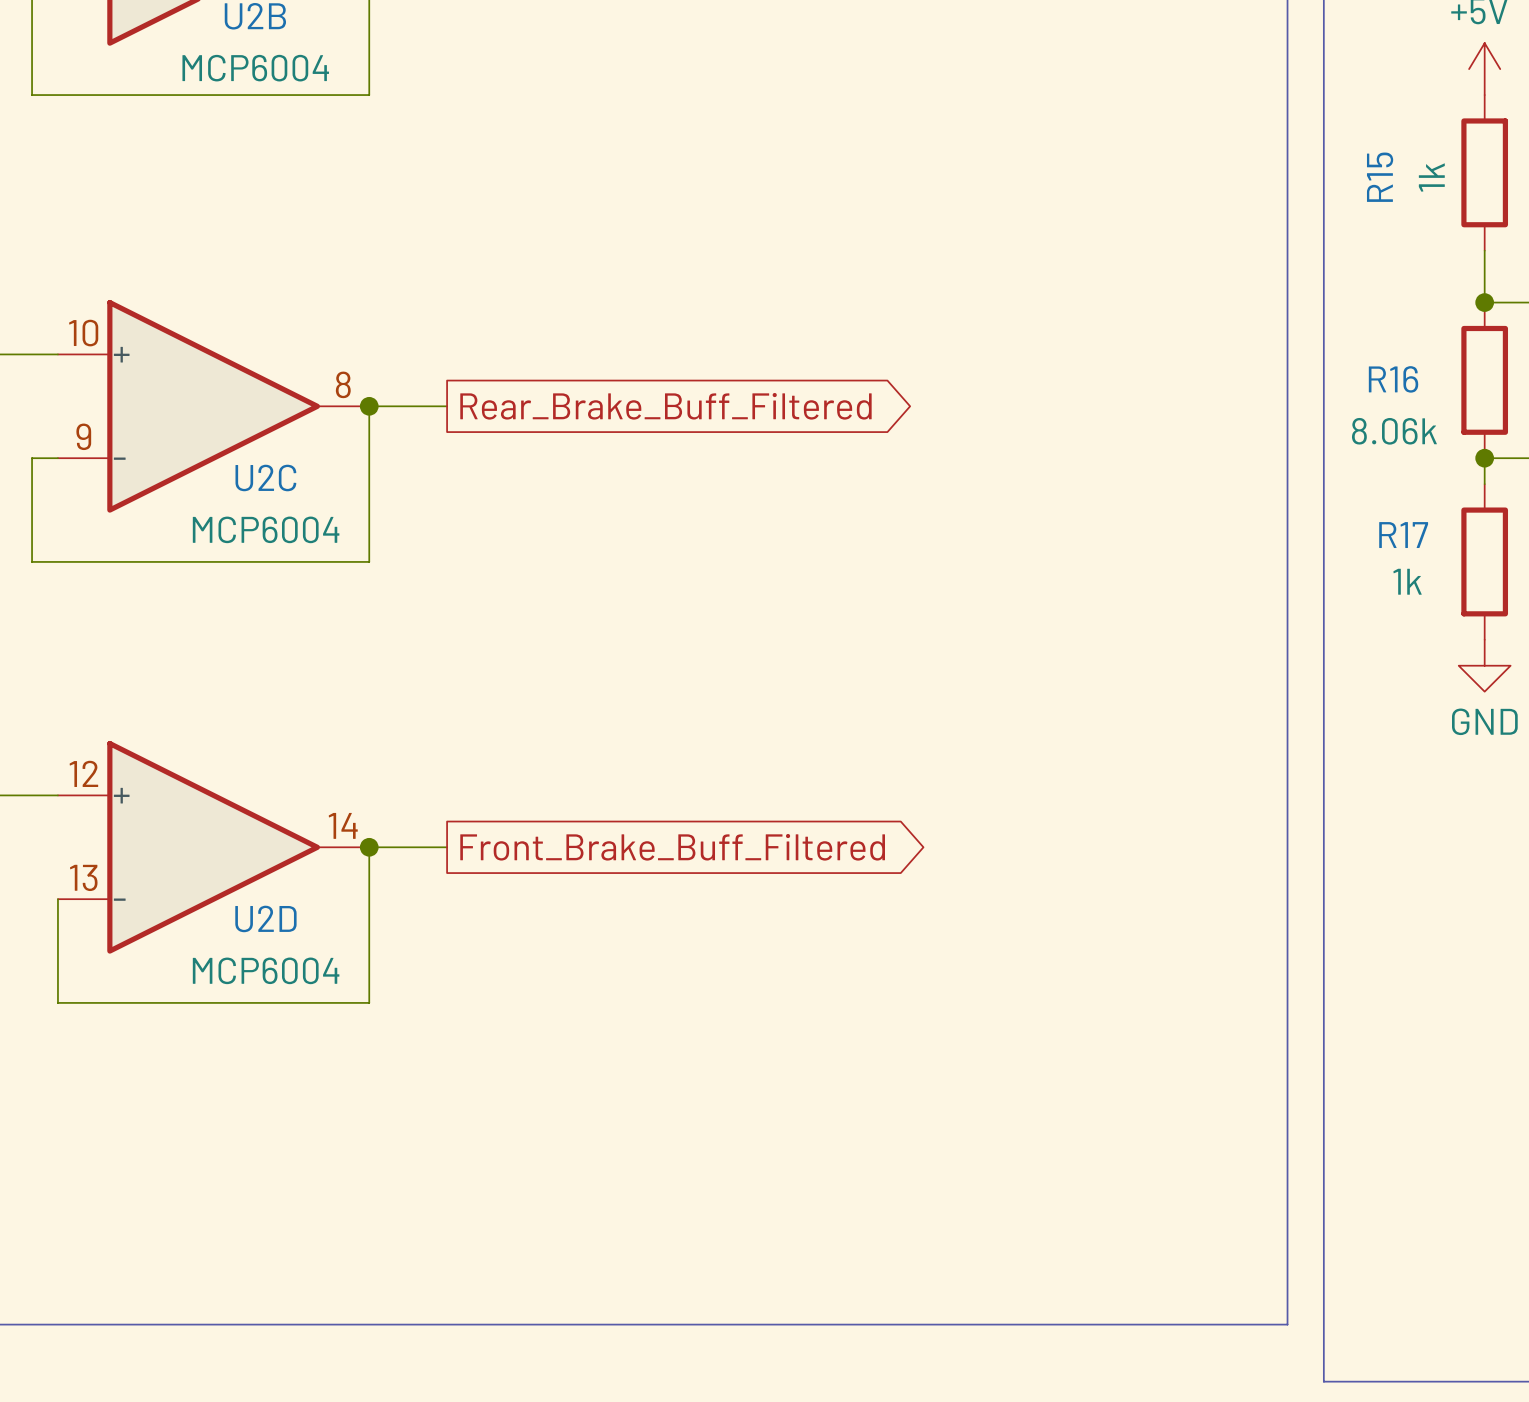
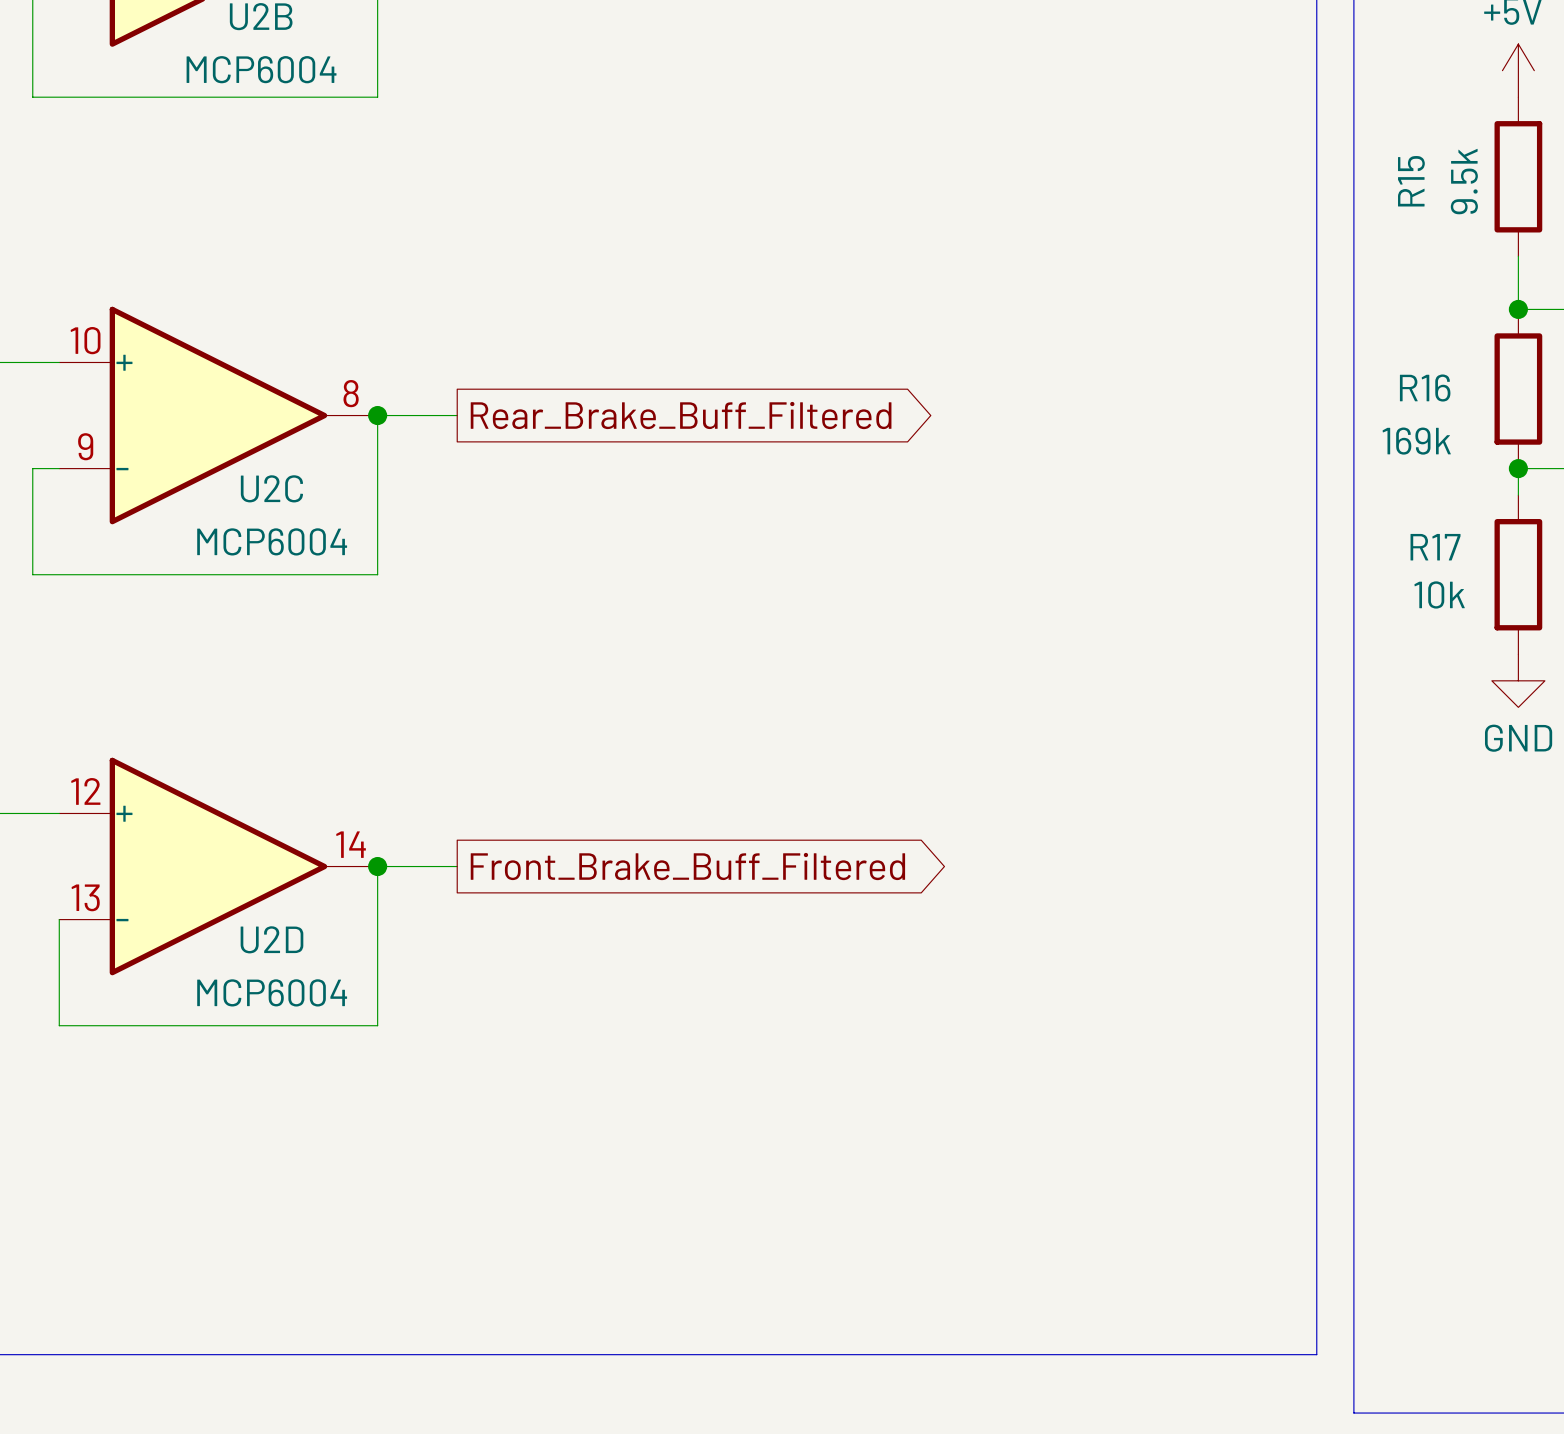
R15 value: 1k (1431, 177) -> 9.5k (1464, 181)
R16 value: 8.06k (1394, 431) -> 169k (1416, 441)
R17 value: 1k (1407, 581) -> 10k (1439, 594)

